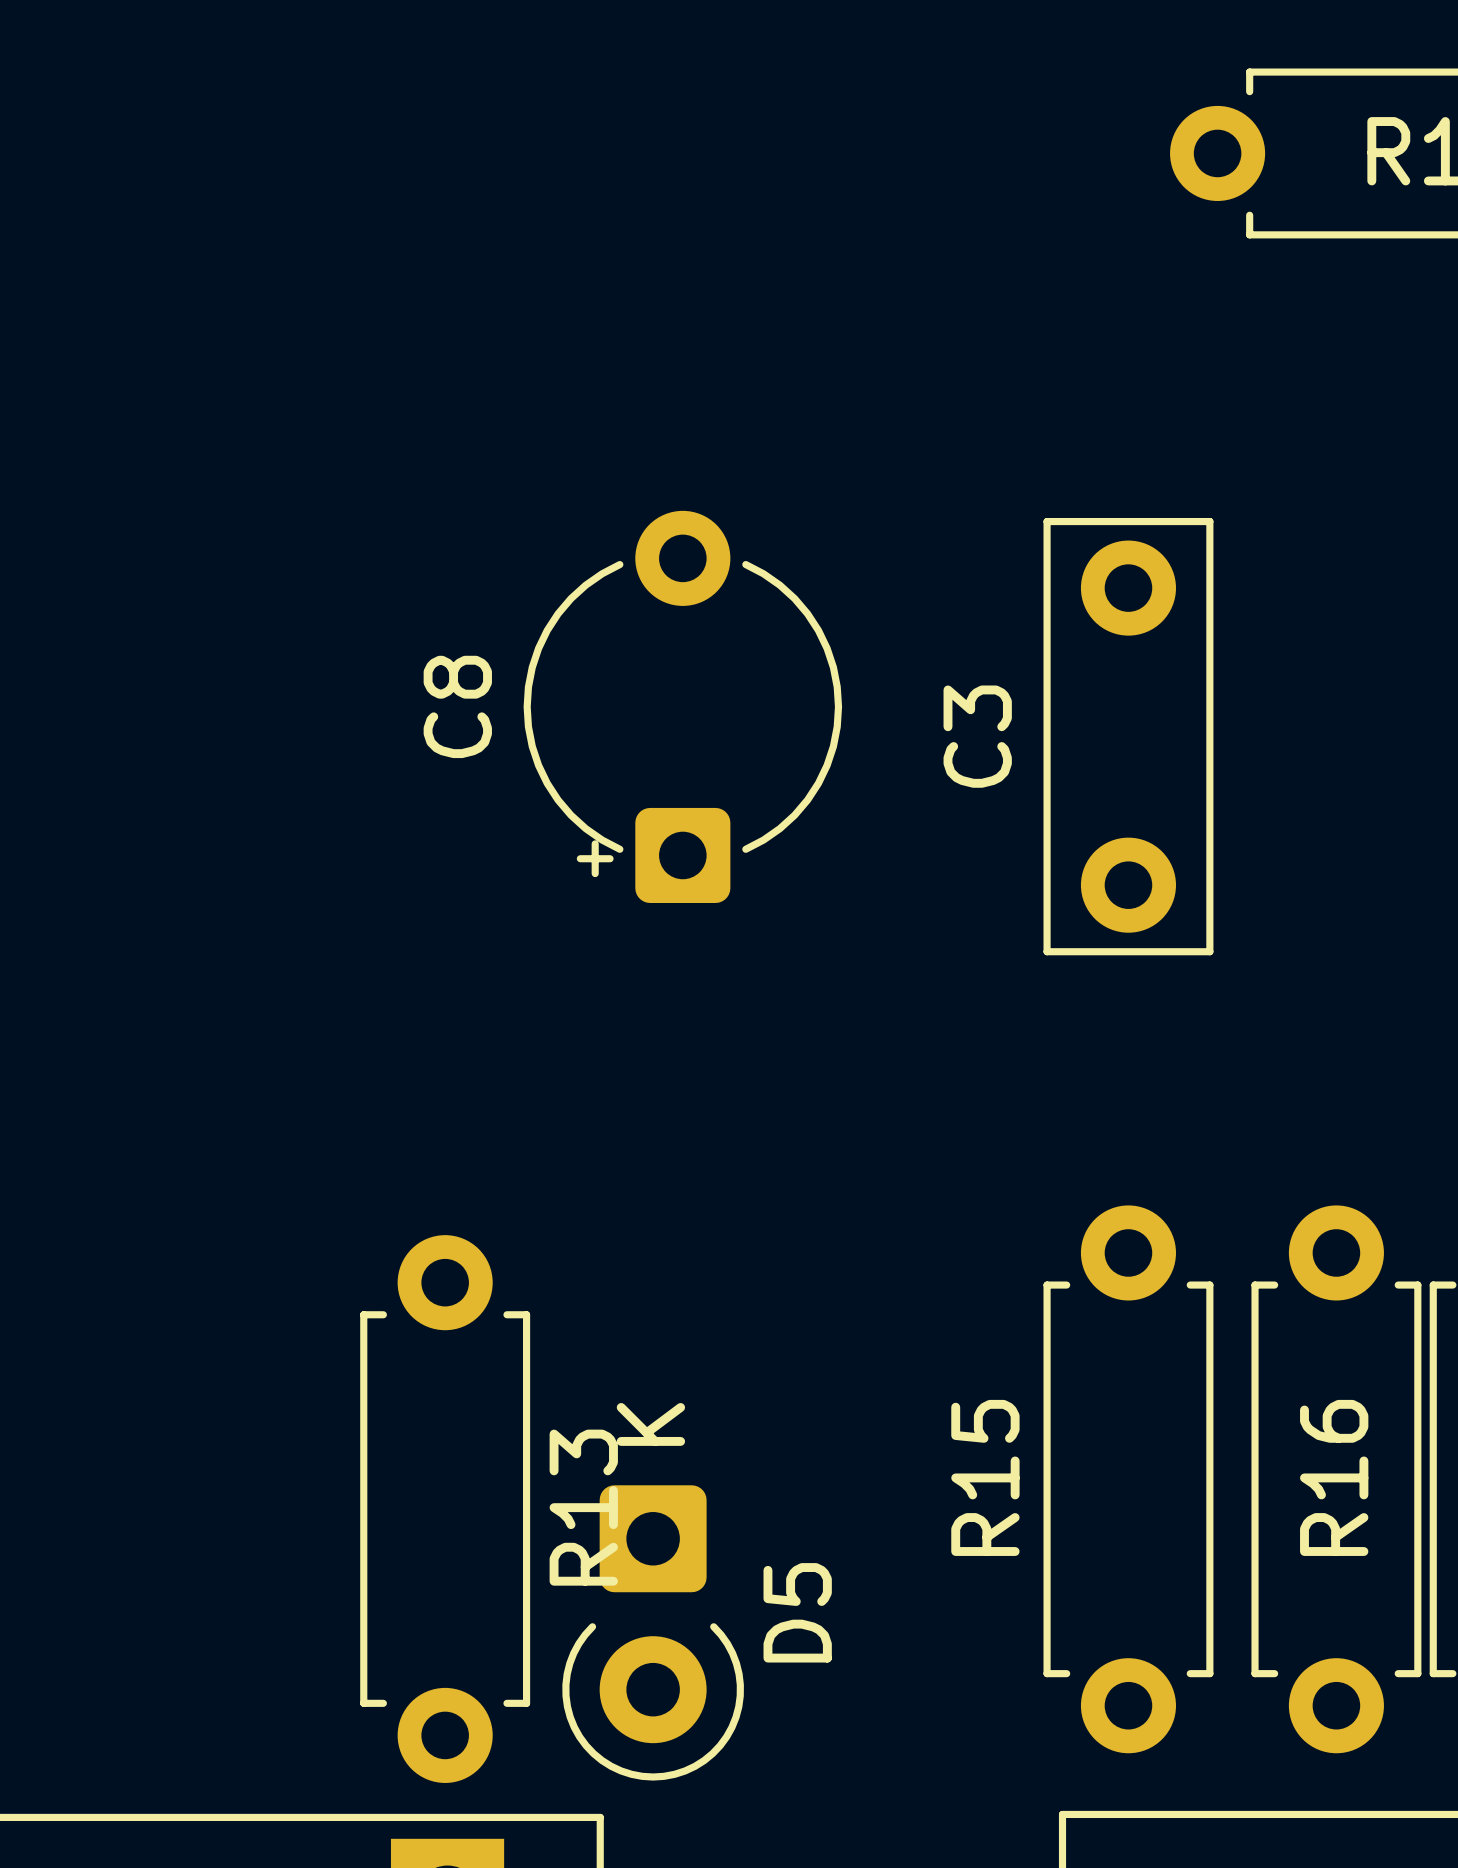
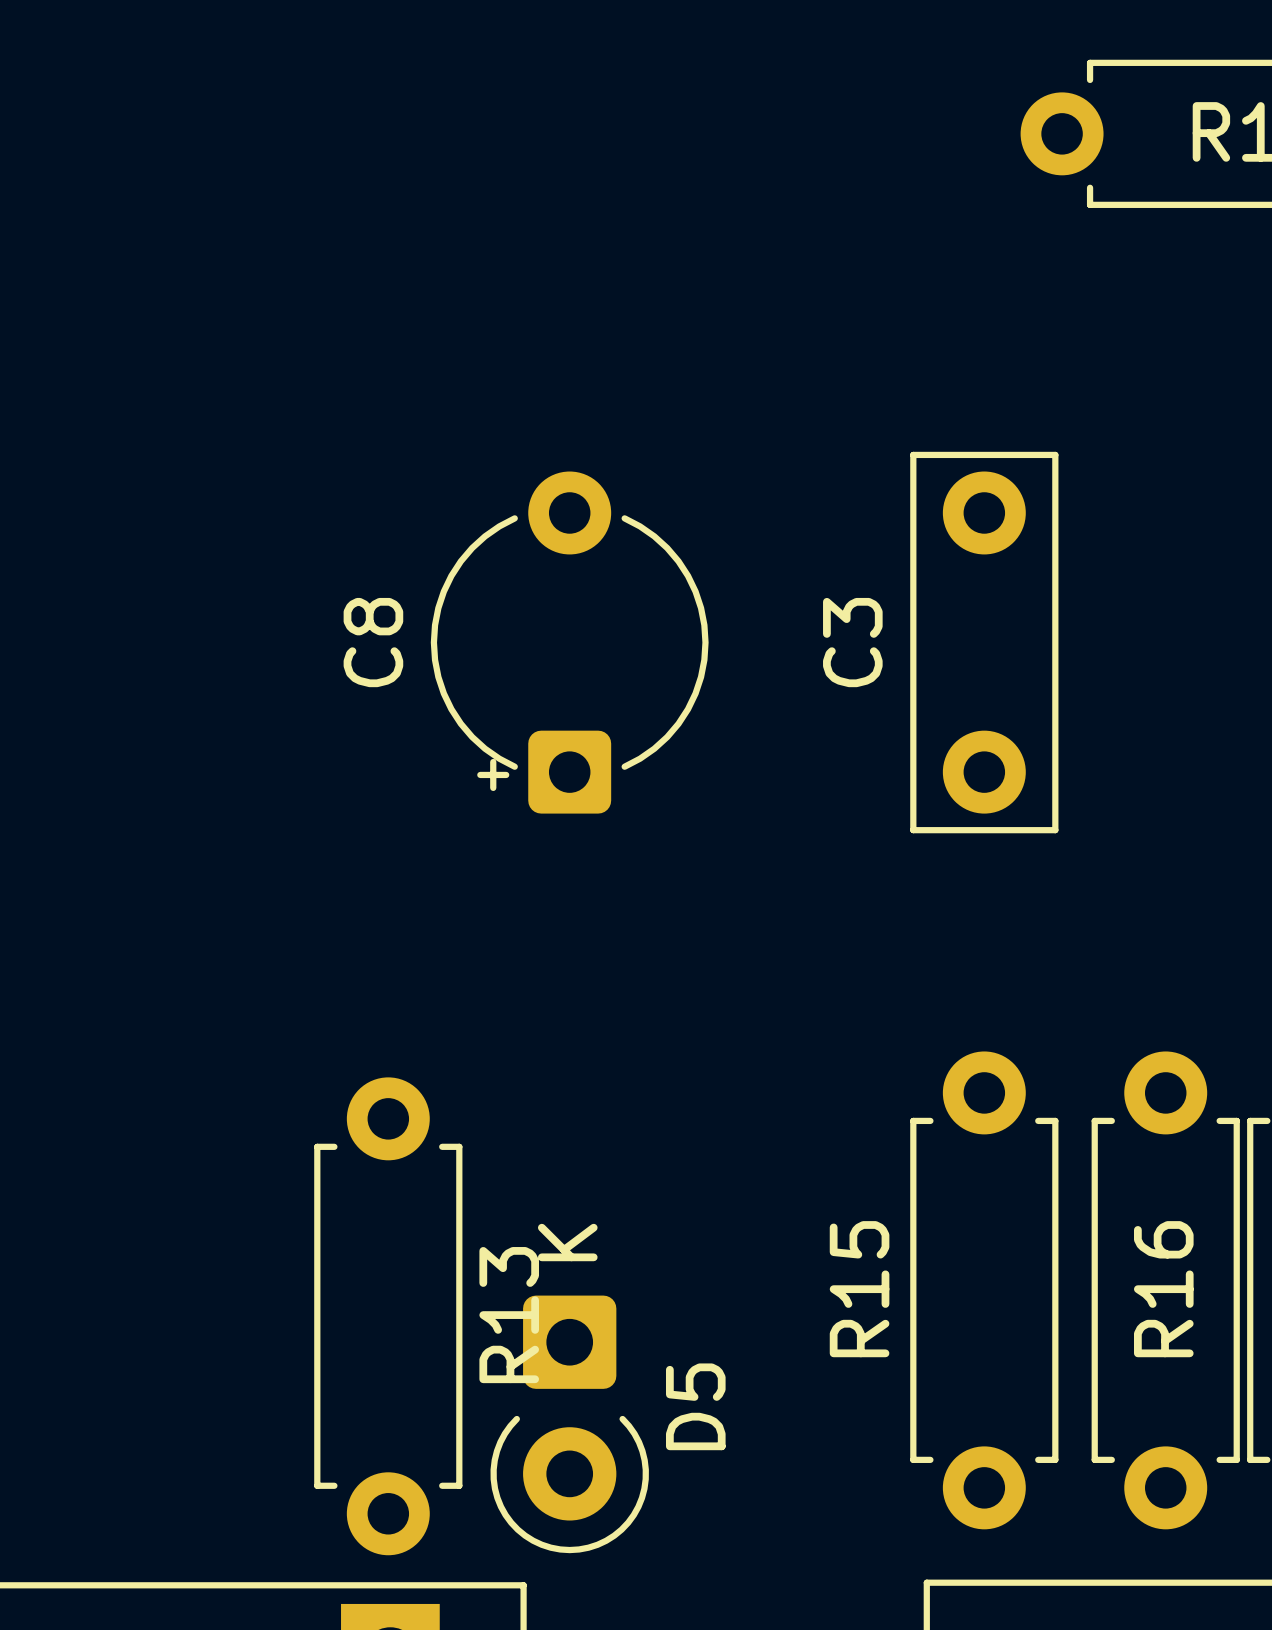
C8 position: (682, 706) -> (569, 642)

